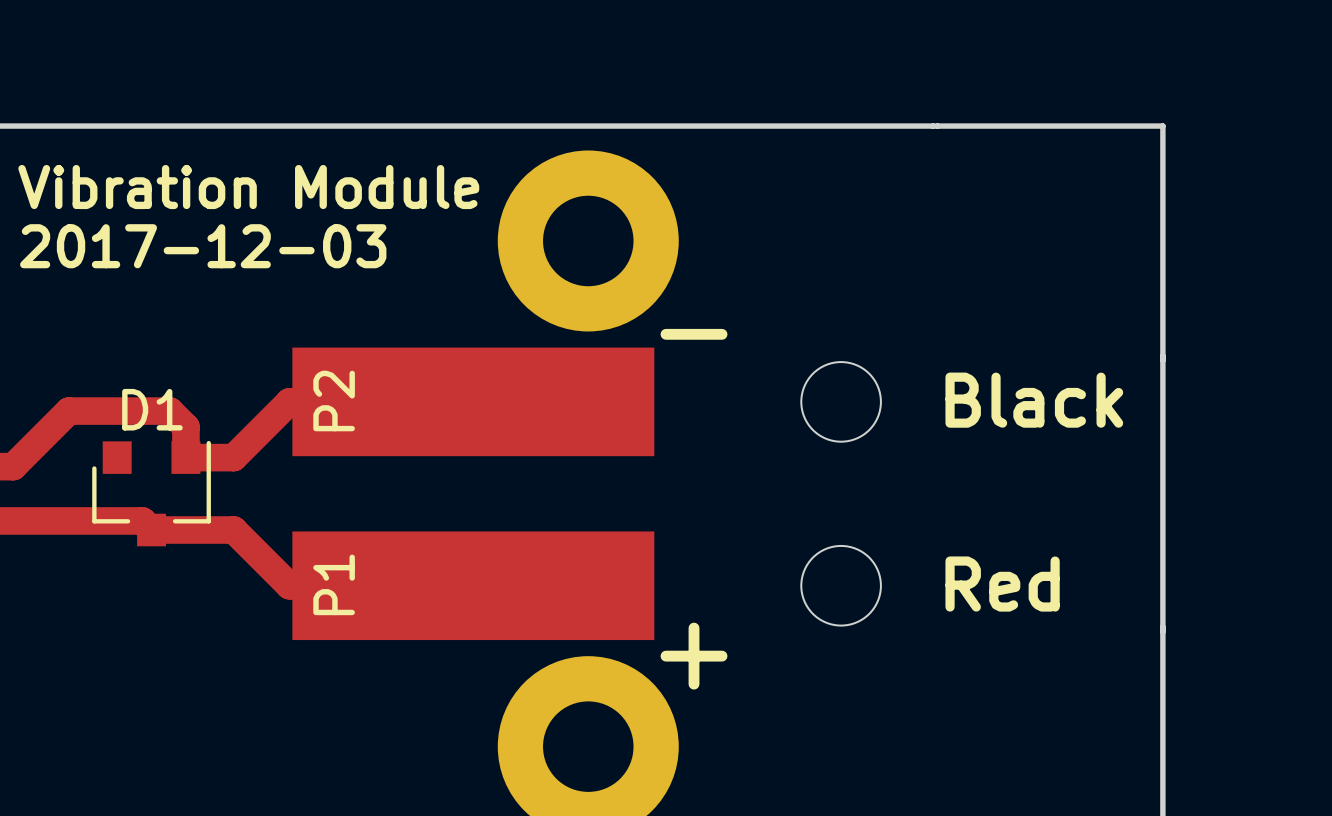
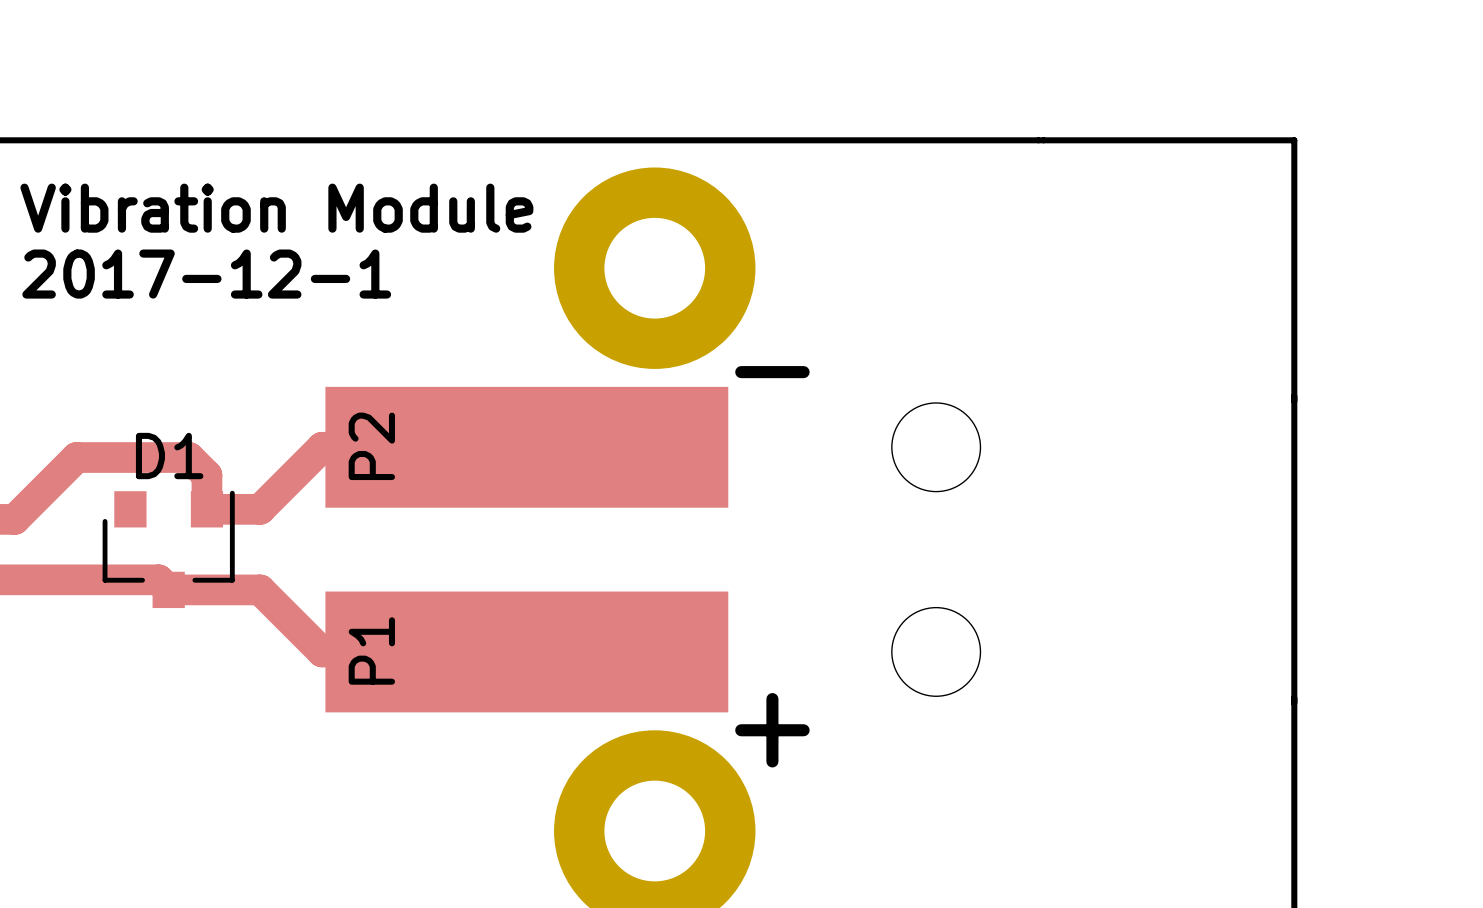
text: 2017-12-03 (203, 246) -> 2017-12-1 (206, 274)
text: Black (1034, 400) -> none
text: Red (1002, 584) -> none

